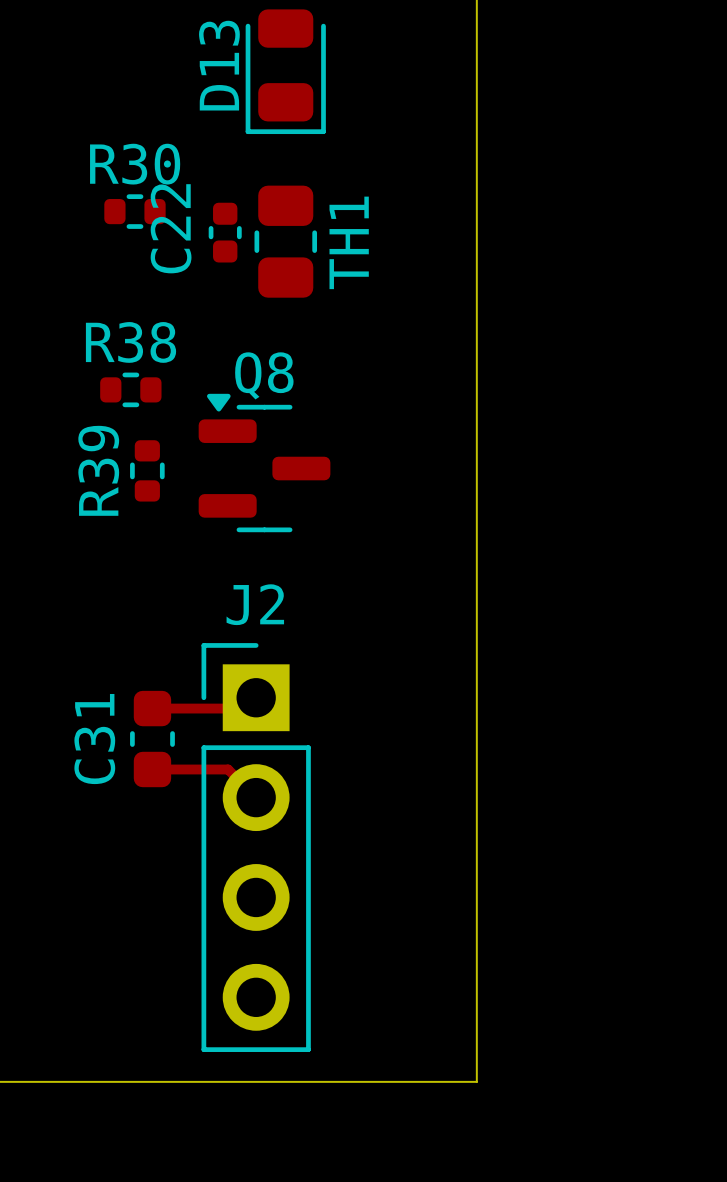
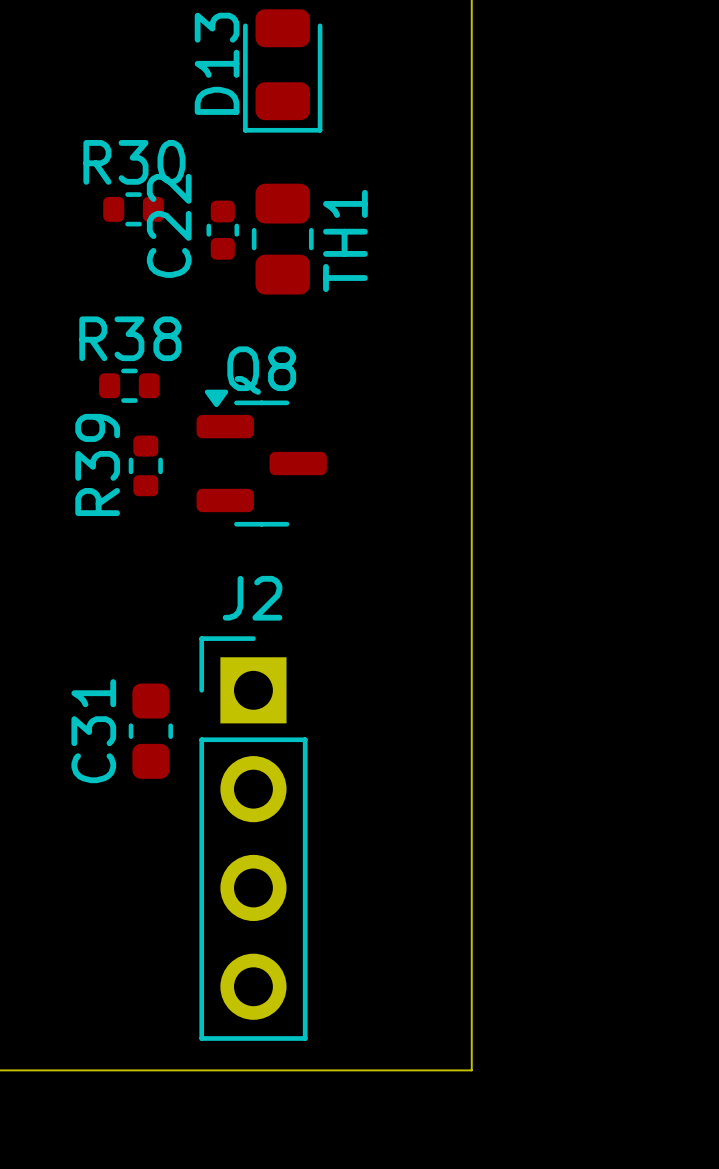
top track: (256, 697) (245, 708) (152, 708) -> none
top track: (152, 769) (228, 769) (256, 797) -> none

